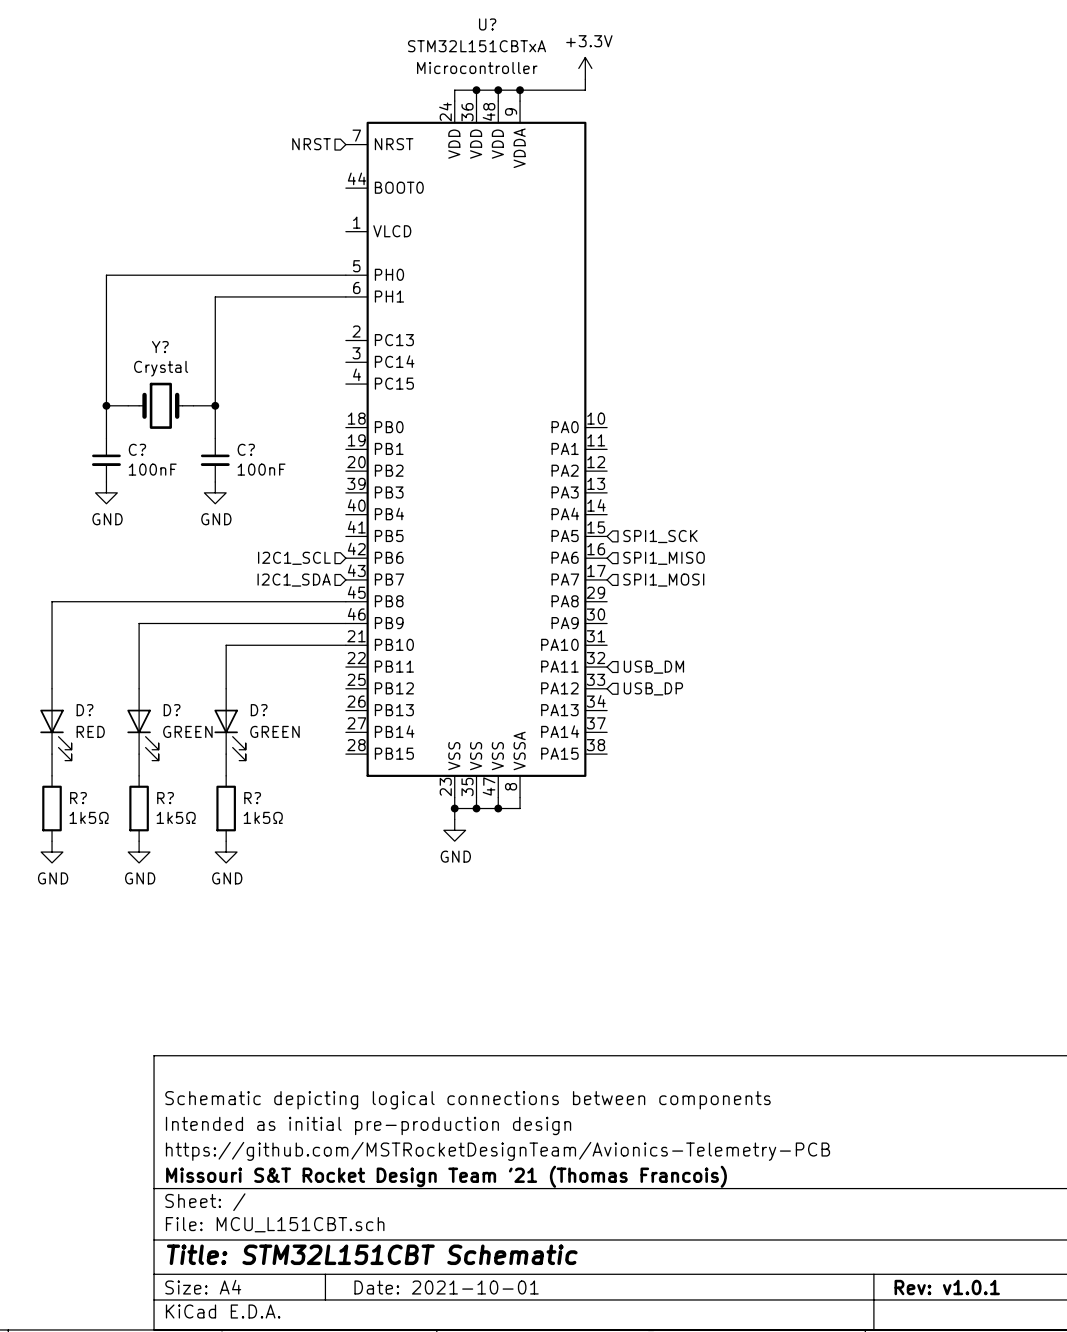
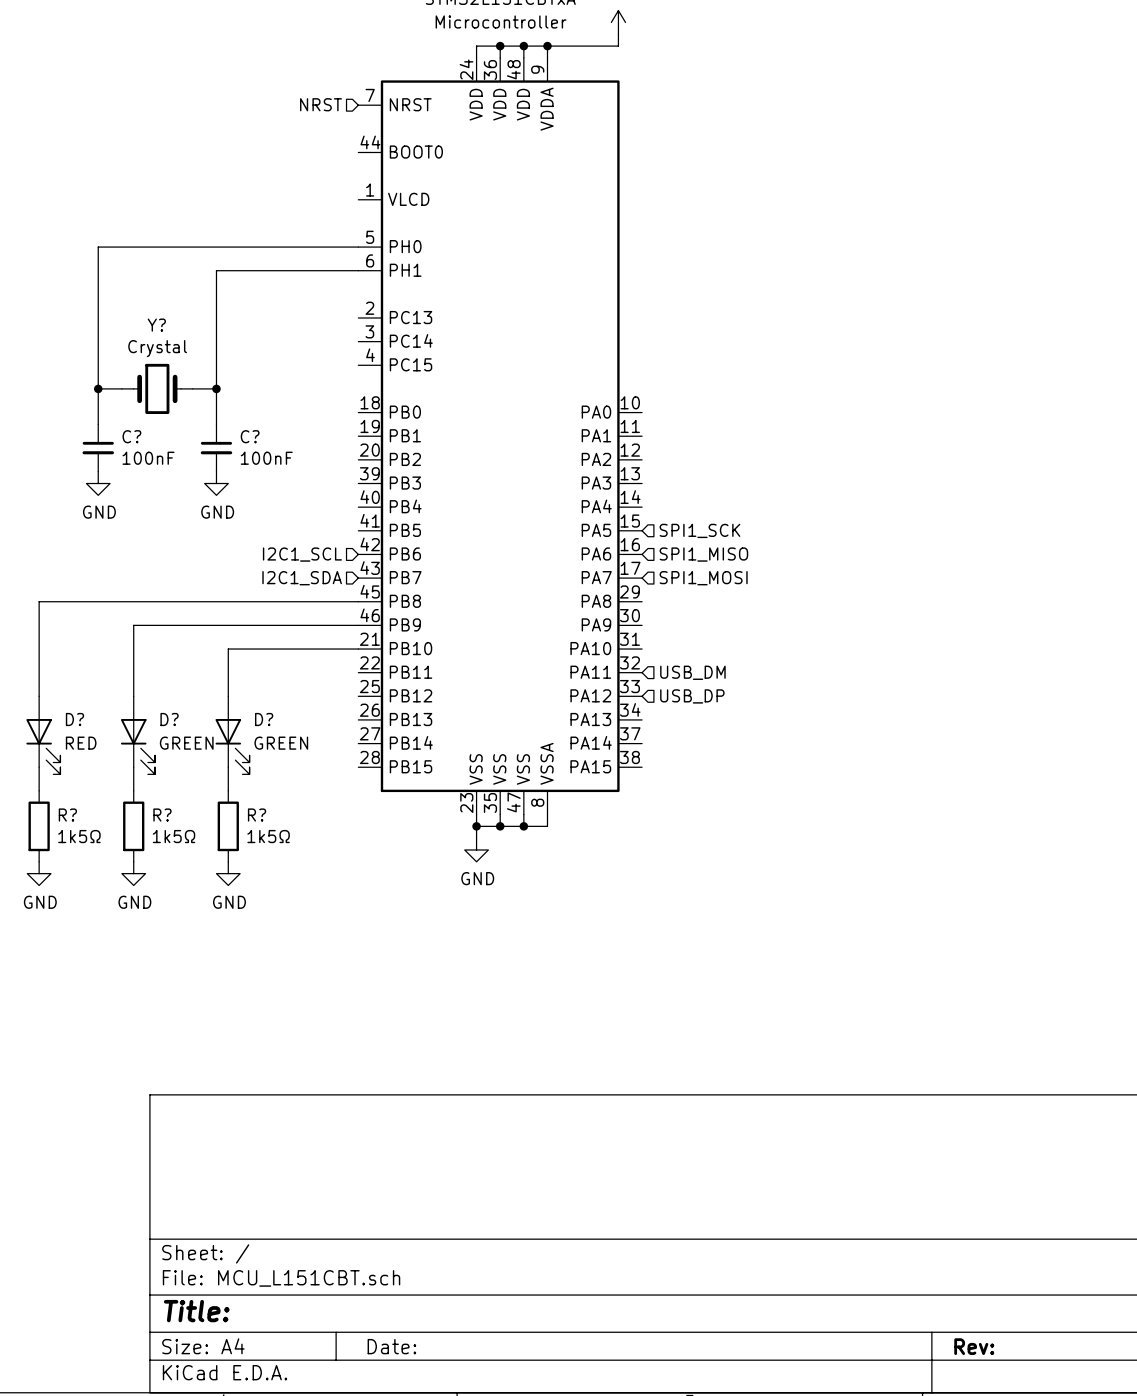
title block: Schematic depicting logical connections between components (467, 1100) -> none
title block: Intended as initial pre-production design (368, 1125) -> none
title block: https://github.com/MSTRocketDesignTeam/Avionics-Telemetry-PCB (497, 1151) -> none
title block: Missouri S&T Rocket Design Team '21 (Thomas Francois) (446, 1176) -> none
title block: Title: STM32L151CBT Schematic (372, 1254) -> Title: (196, 1311)
title block: Date: 2021-10-01 (446, 1287) -> Date: (391, 1346)
title block: Rev: v1.0.1 (947, 1287) -> Rev: (974, 1346)

